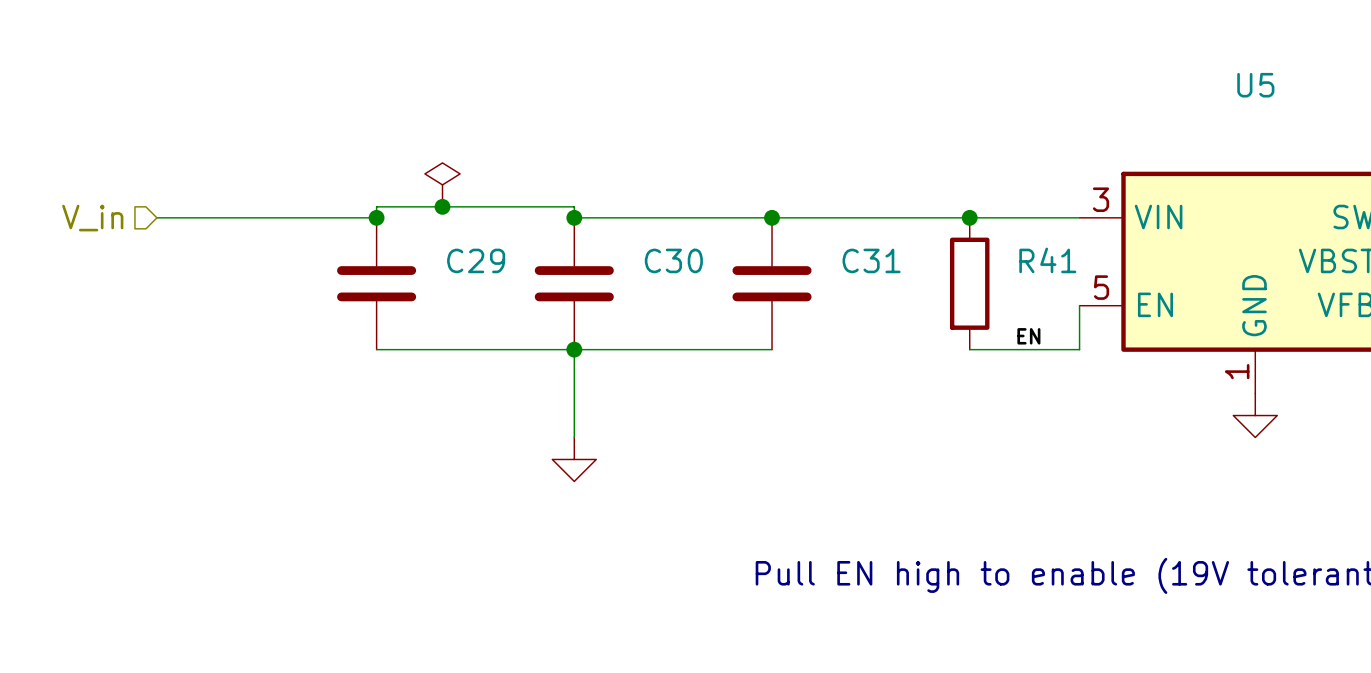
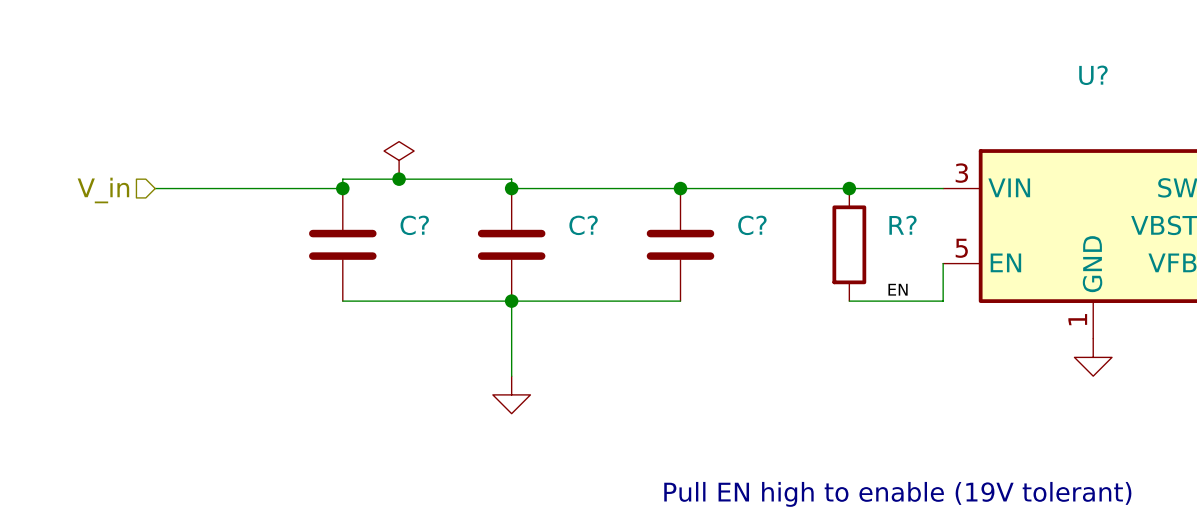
U5 name: U5 (1255, 85) -> U? (1093, 75)
C29 name: C29 (476, 260) -> C? (414, 225)
C30 name: C30 (673, 260) -> C? (583, 225)
C31 name: C31 (871, 260) -> C? (752, 225)
R41 name: R41 (1047, 260) -> R? (903, 225)

